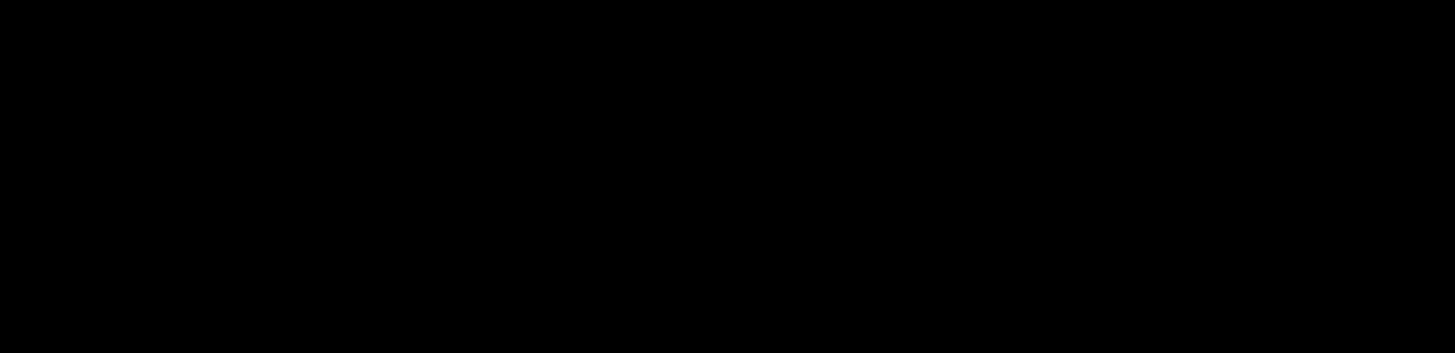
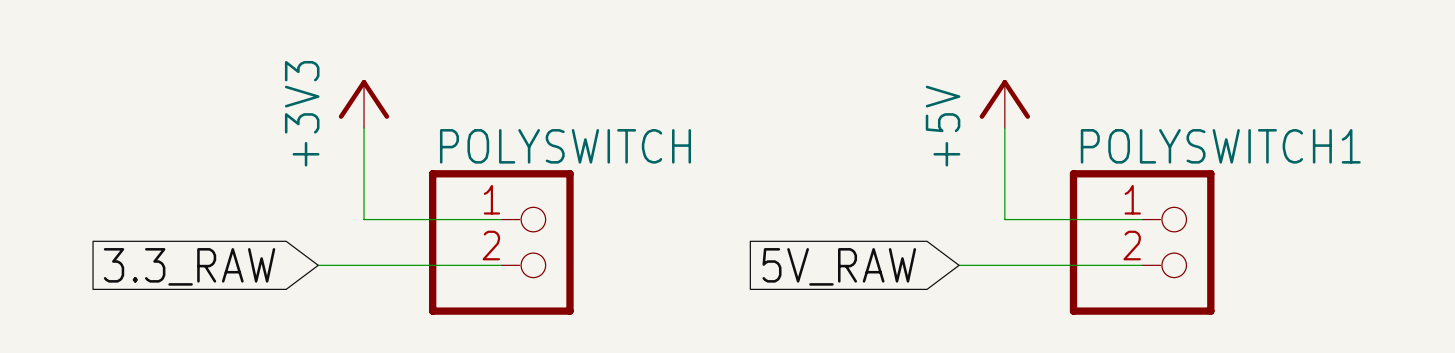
power symbol: none -> +3V3 (364, 103)
power symbol: none -> +5V (1004, 103)
wire: none -> (364, 128) (364, 219) (501, 219)
wire: none -> (1004, 128) (1004, 219) (1142, 219)
POLYSWITCH: none -> (501, 242)
POLYSWITCH1: none -> (1142, 242)
wire: none -> (318, 265) (501, 265)
wire: none -> (959, 265) (1142, 265)
global label: none -> 3.3_RAW (189, 266)
global label: none -> 5V_RAW (839, 266)

